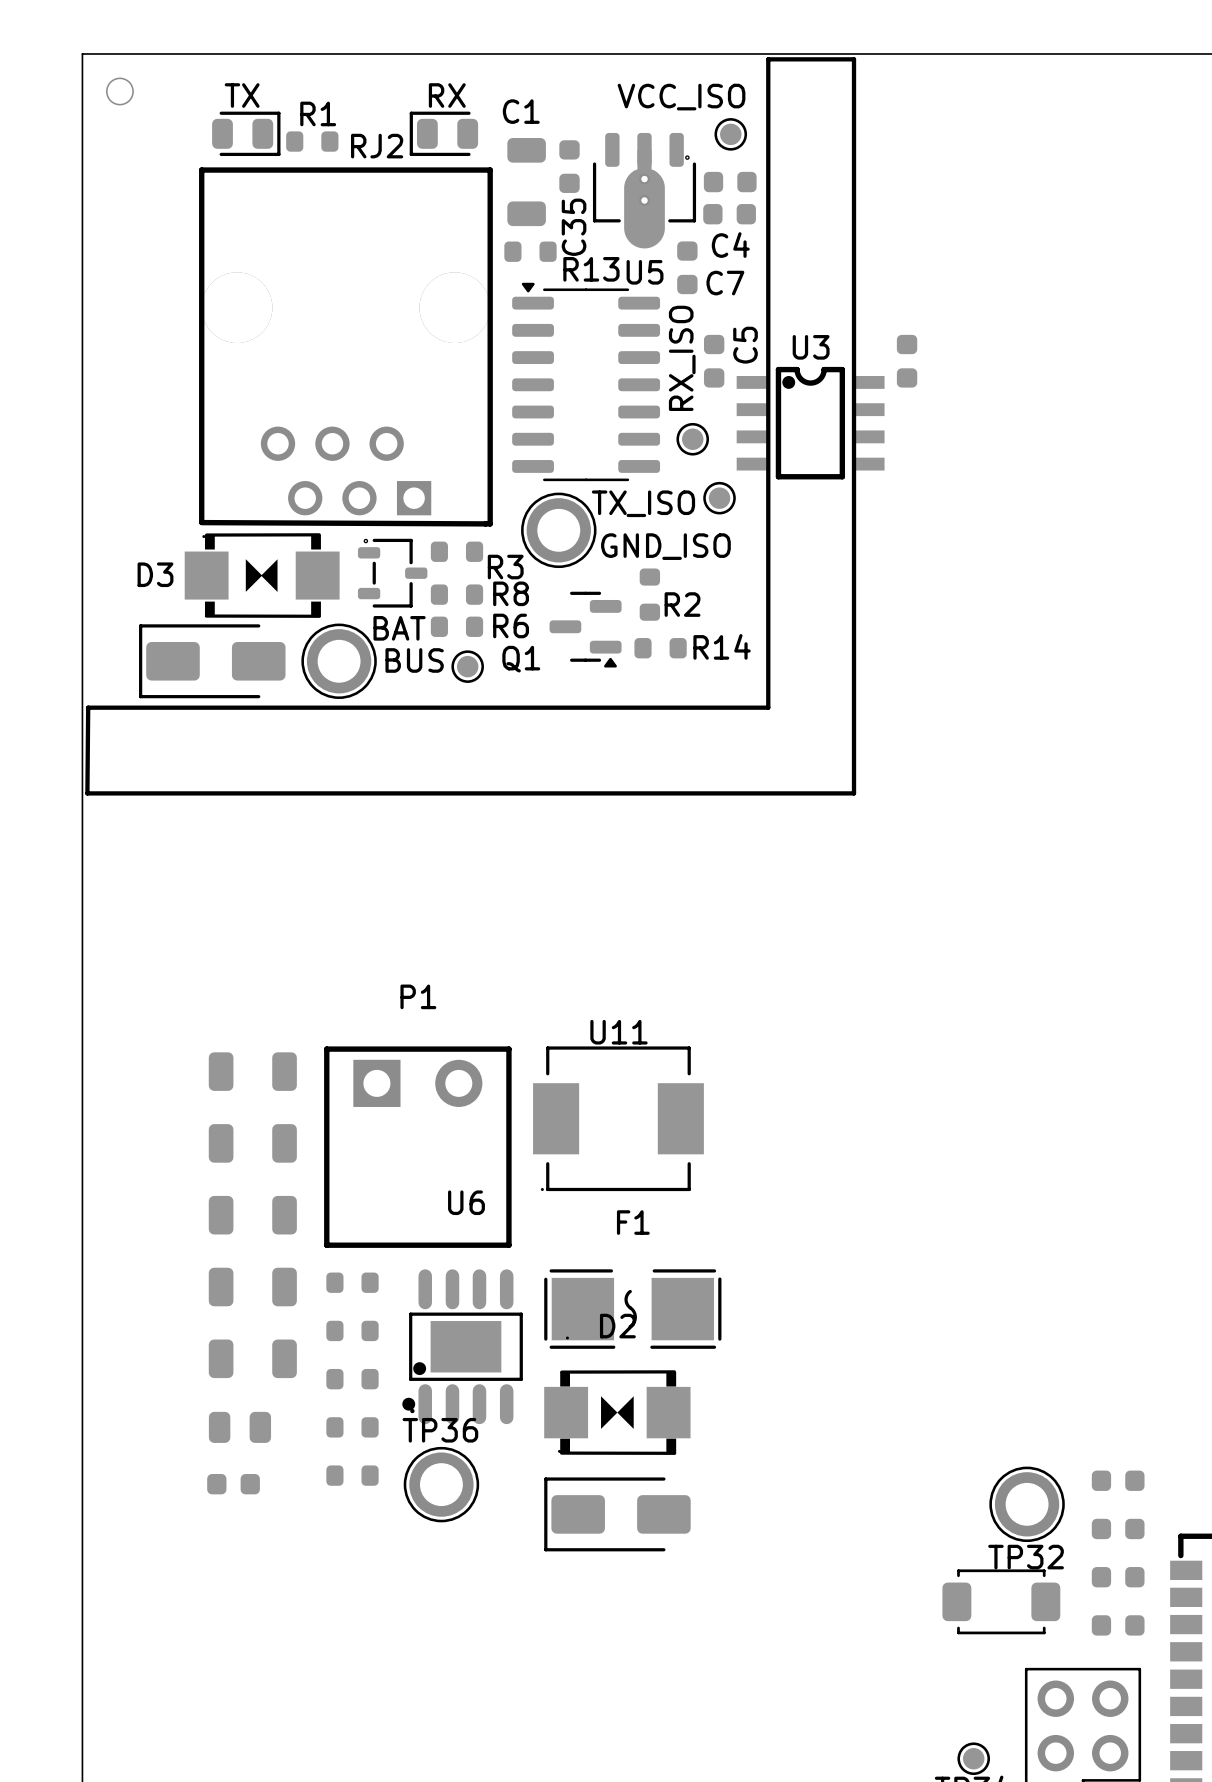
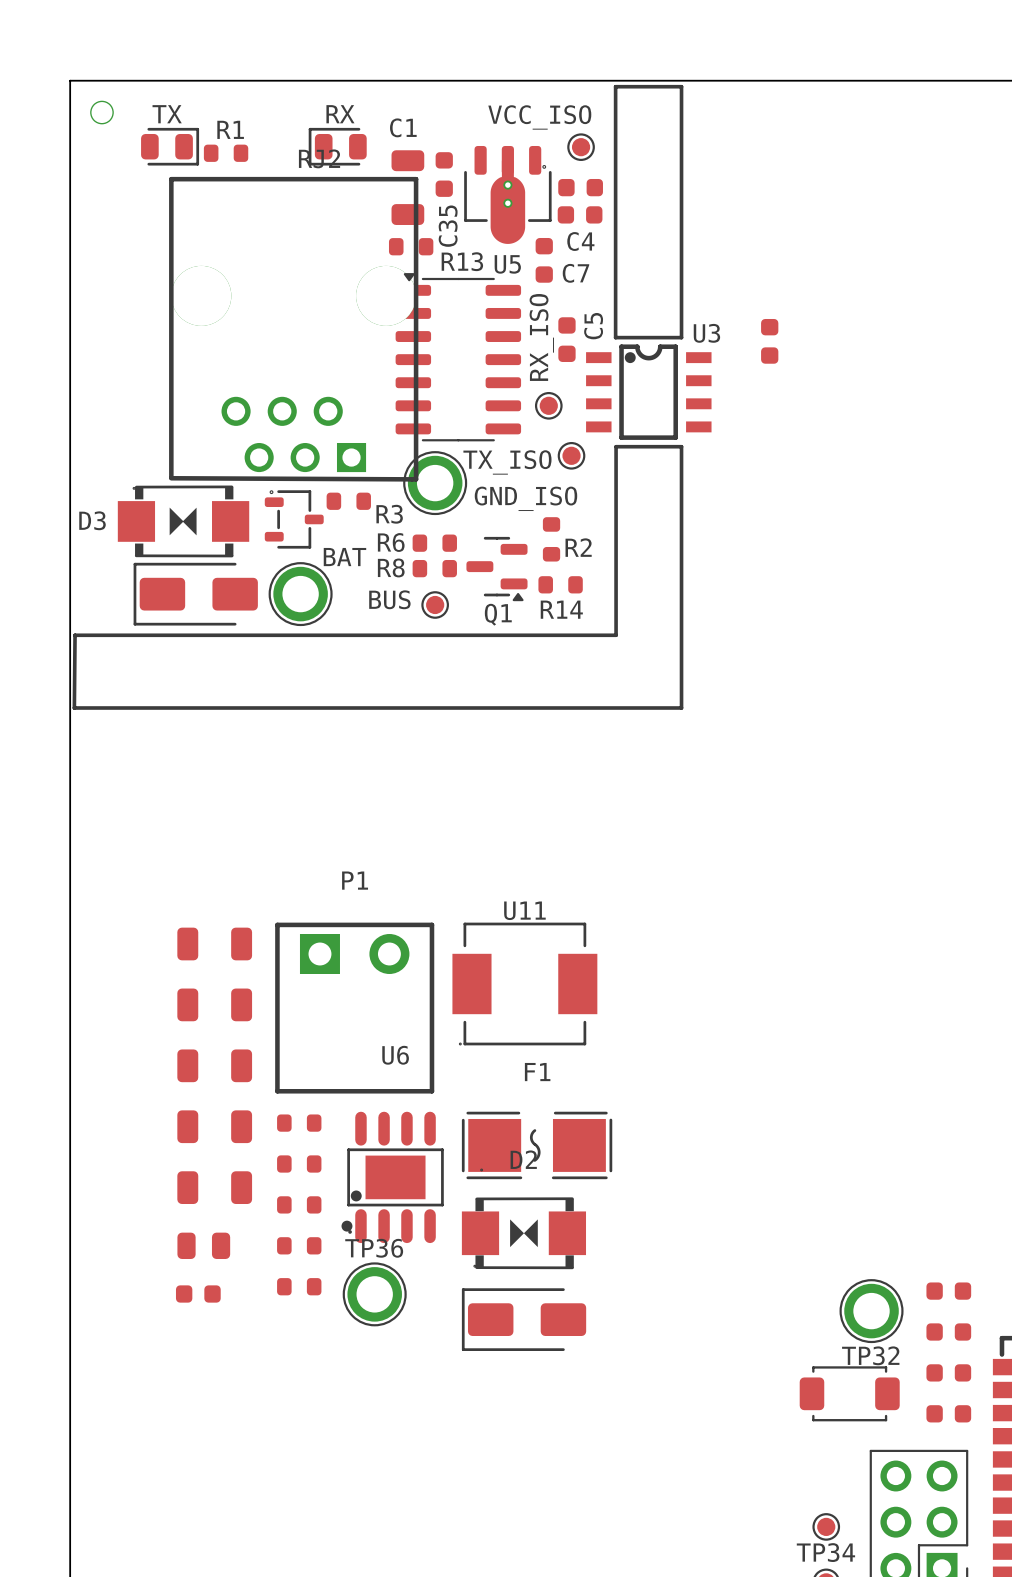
line: none -> (615, 86) (681, 86) (681, 337) (615, 337) (615, 86)
part position: (246, 133) -> (170, 146)
part position: (443, 133) -> (337, 146)
part position: (730, 134) -> (581, 147)
R1 position: (312, 141) -> (226, 153)
C35 position: (569, 166) -> (444, 174)
C1 position: (526, 182) -> (407, 187)
part position: (730, 182) -> (580, 187)
part position: (644, 190) -> (507, 194)
C4 position: (729, 214) -> (580, 214)
R13 position: (530, 251) -> (411, 246)
C7 position: (687, 267) -> (544, 260)
U3 name position: U3 (811, 347) -> U3 (706, 333)
C5 position: (714, 361) -> (566, 339)
U5 position: (586, 381) -> (458, 357)
U3 position: (810, 423) -> (648, 392)
part position: (692, 439) -> (548, 405)
part position: (719, 498) -> (571, 455)
part position: (558, 530) -> (435, 483)
R3 position: (456, 551) -> (348, 501)
part position: (392, 573) -> (294, 519)
D3 position: (262, 575) -> (183, 521)
R8 name position: R8 (511, 593) -> R8 (391, 567)
R8 position: (456, 594) -> (434, 568)
R6 name position: R6 (511, 625) -> R6 (391, 542)
R6 position: (456, 626) -> (434, 543)
part value position: BAT (399, 628) -> BAT (344, 557)
R14 name position: R14 (722, 646) -> R14 (561, 609)
Q1 name position: Q1 (521, 659) -> Q1 (498, 614)
part position: (212, 661) -> (195, 594)
part position: (339, 661) -> (300, 594)
part position: (467, 666) -> (435, 604)
line: (725, 707) (768, 707) (768, 59) (854, 59) (854, 793) (803, 793) -> (616, 635) (616, 446) (681, 446) (681, 707)

